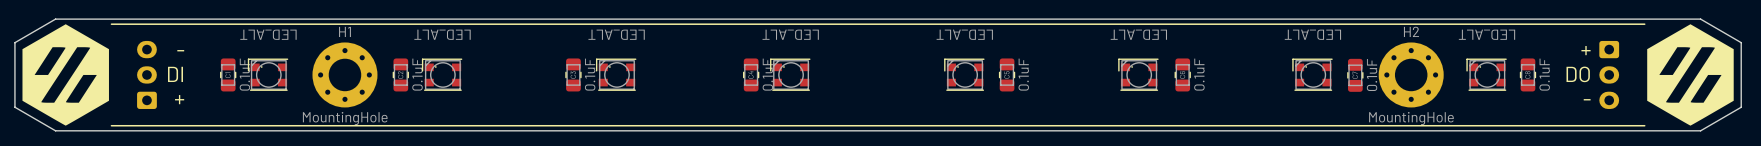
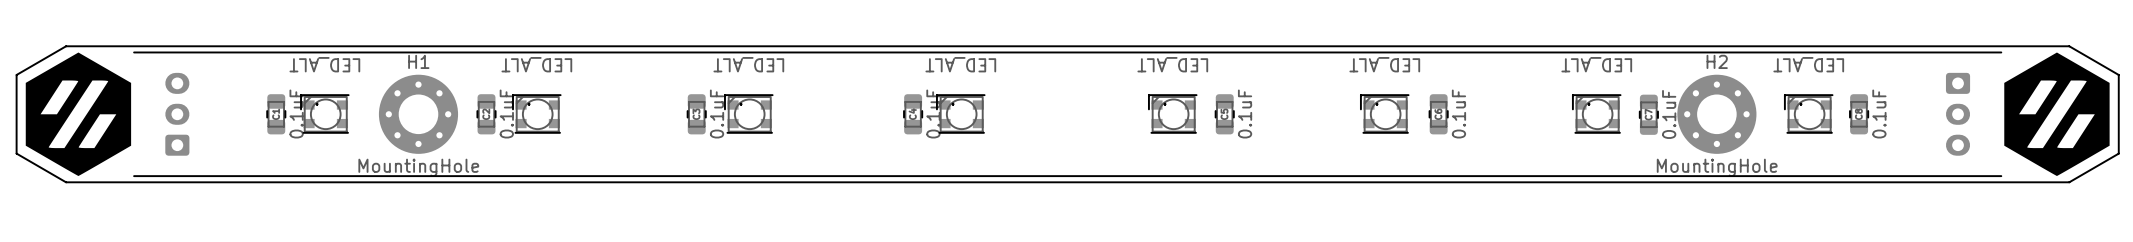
text: - (180, 50) -> none
text: + (1586, 50) -> none
text: DI (175, 74) -> none
text: DO (1578, 74) -> none
text: + (179, 99) -> none
text: - (1587, 99) -> none

